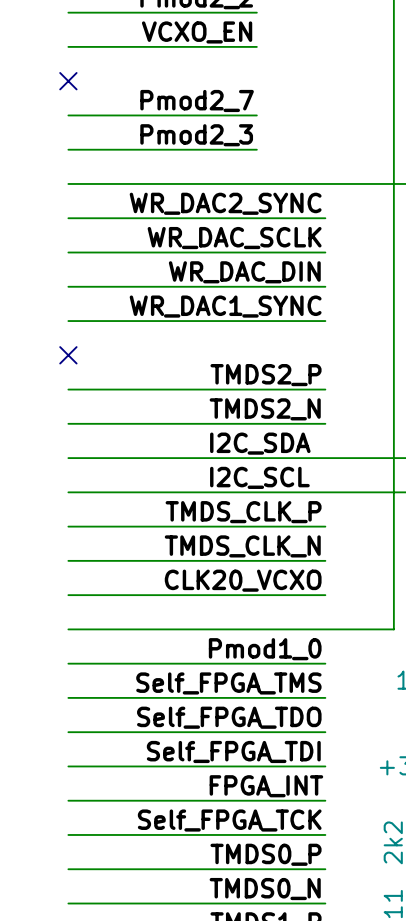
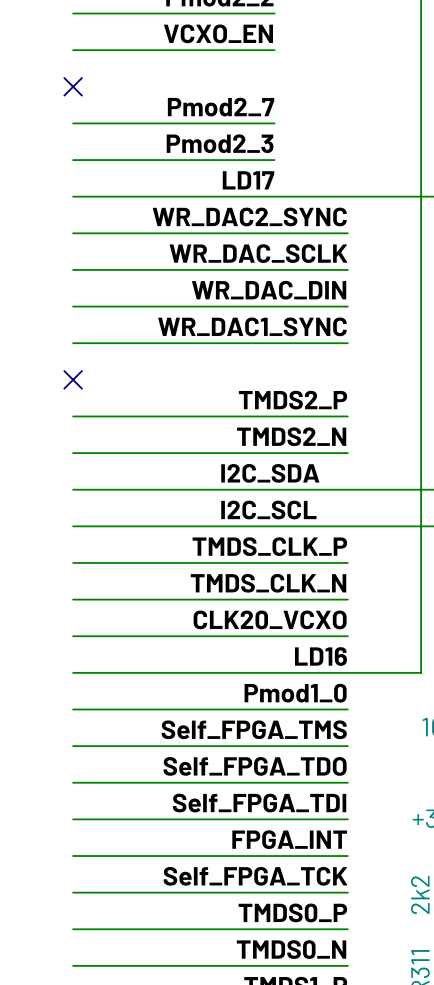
label: none -> LD17 (248, 180)
label: none -> LD16 (320, 656)

